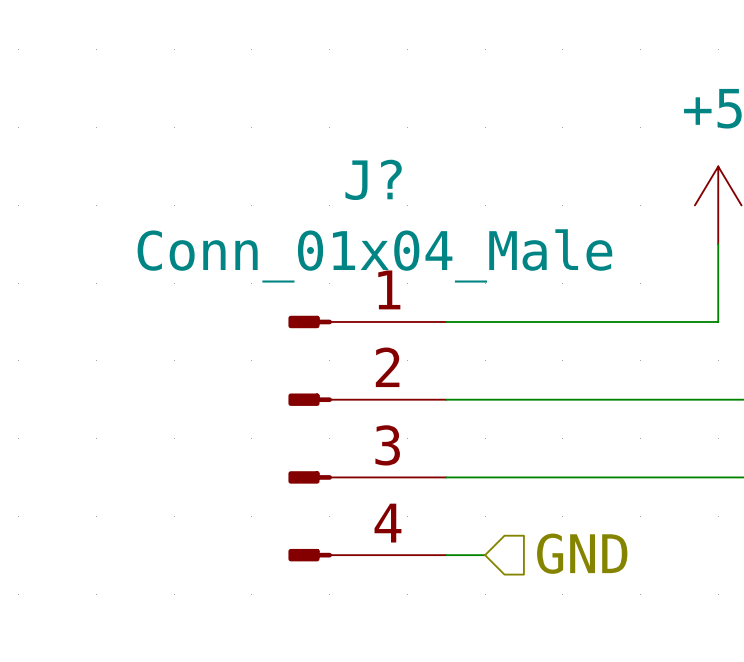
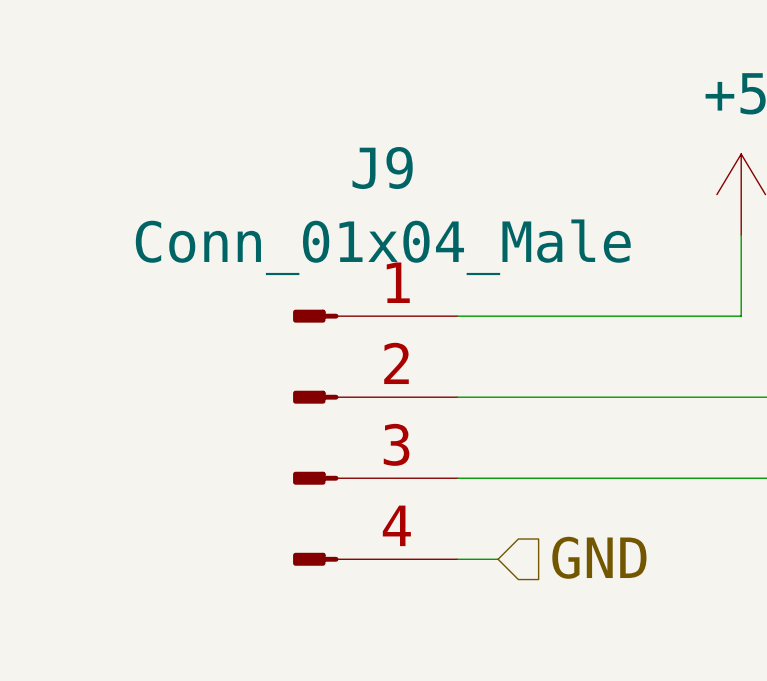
J? name: J? (373, 179) -> J9 (382, 168)

